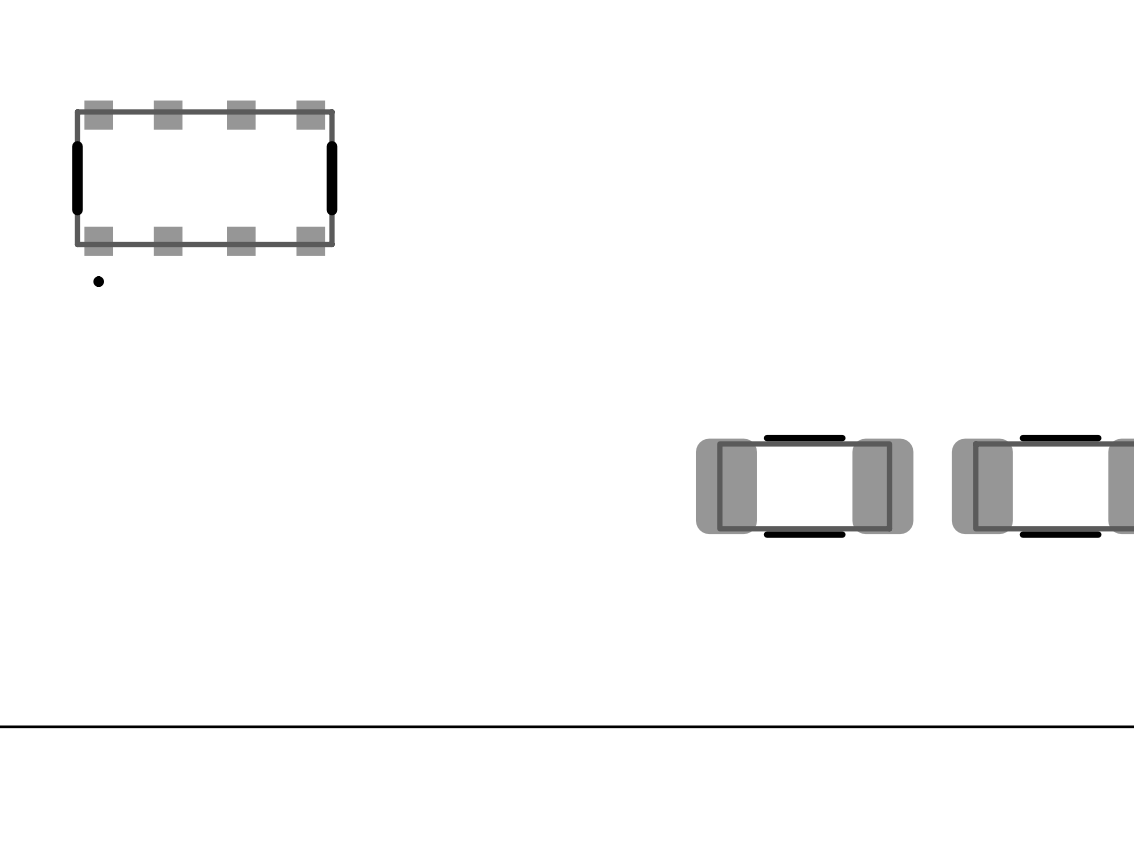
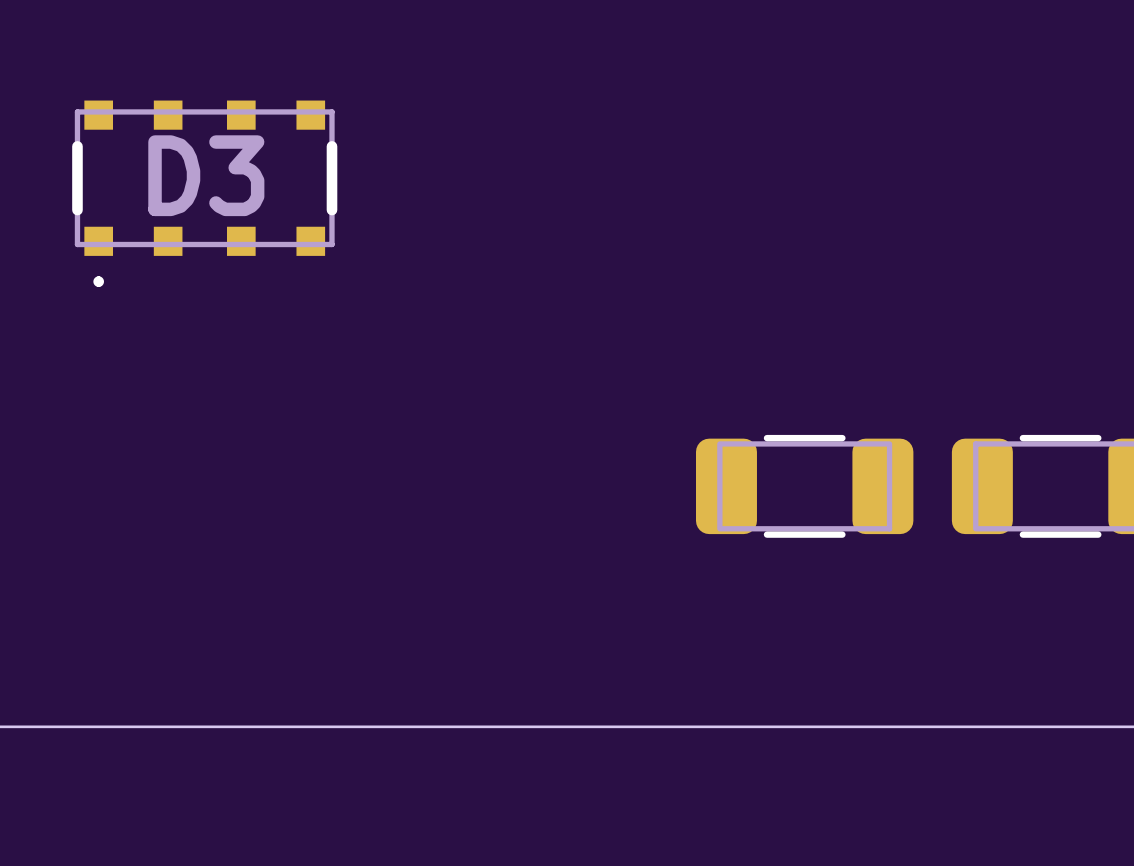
D3 name: none -> D3 (206, 175)

